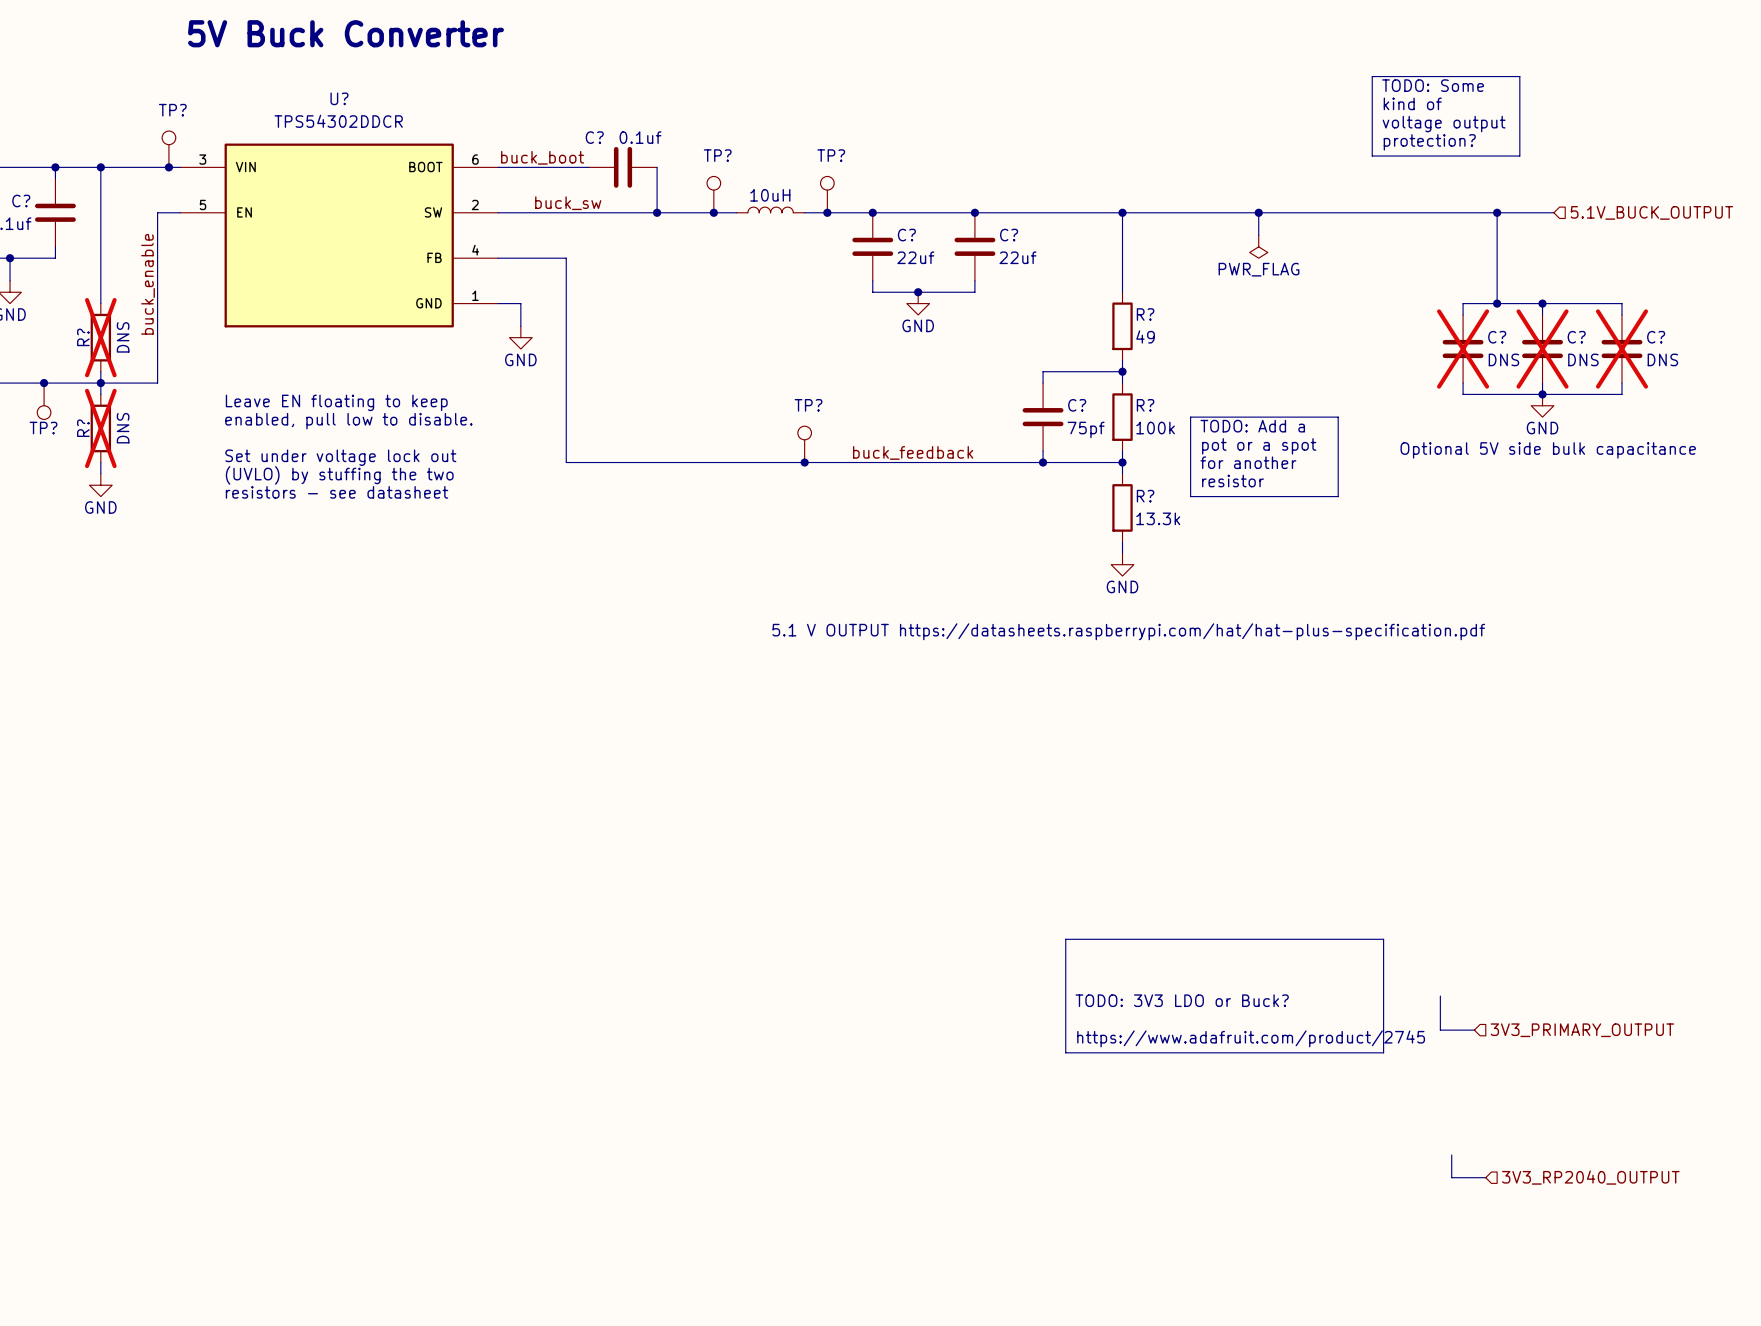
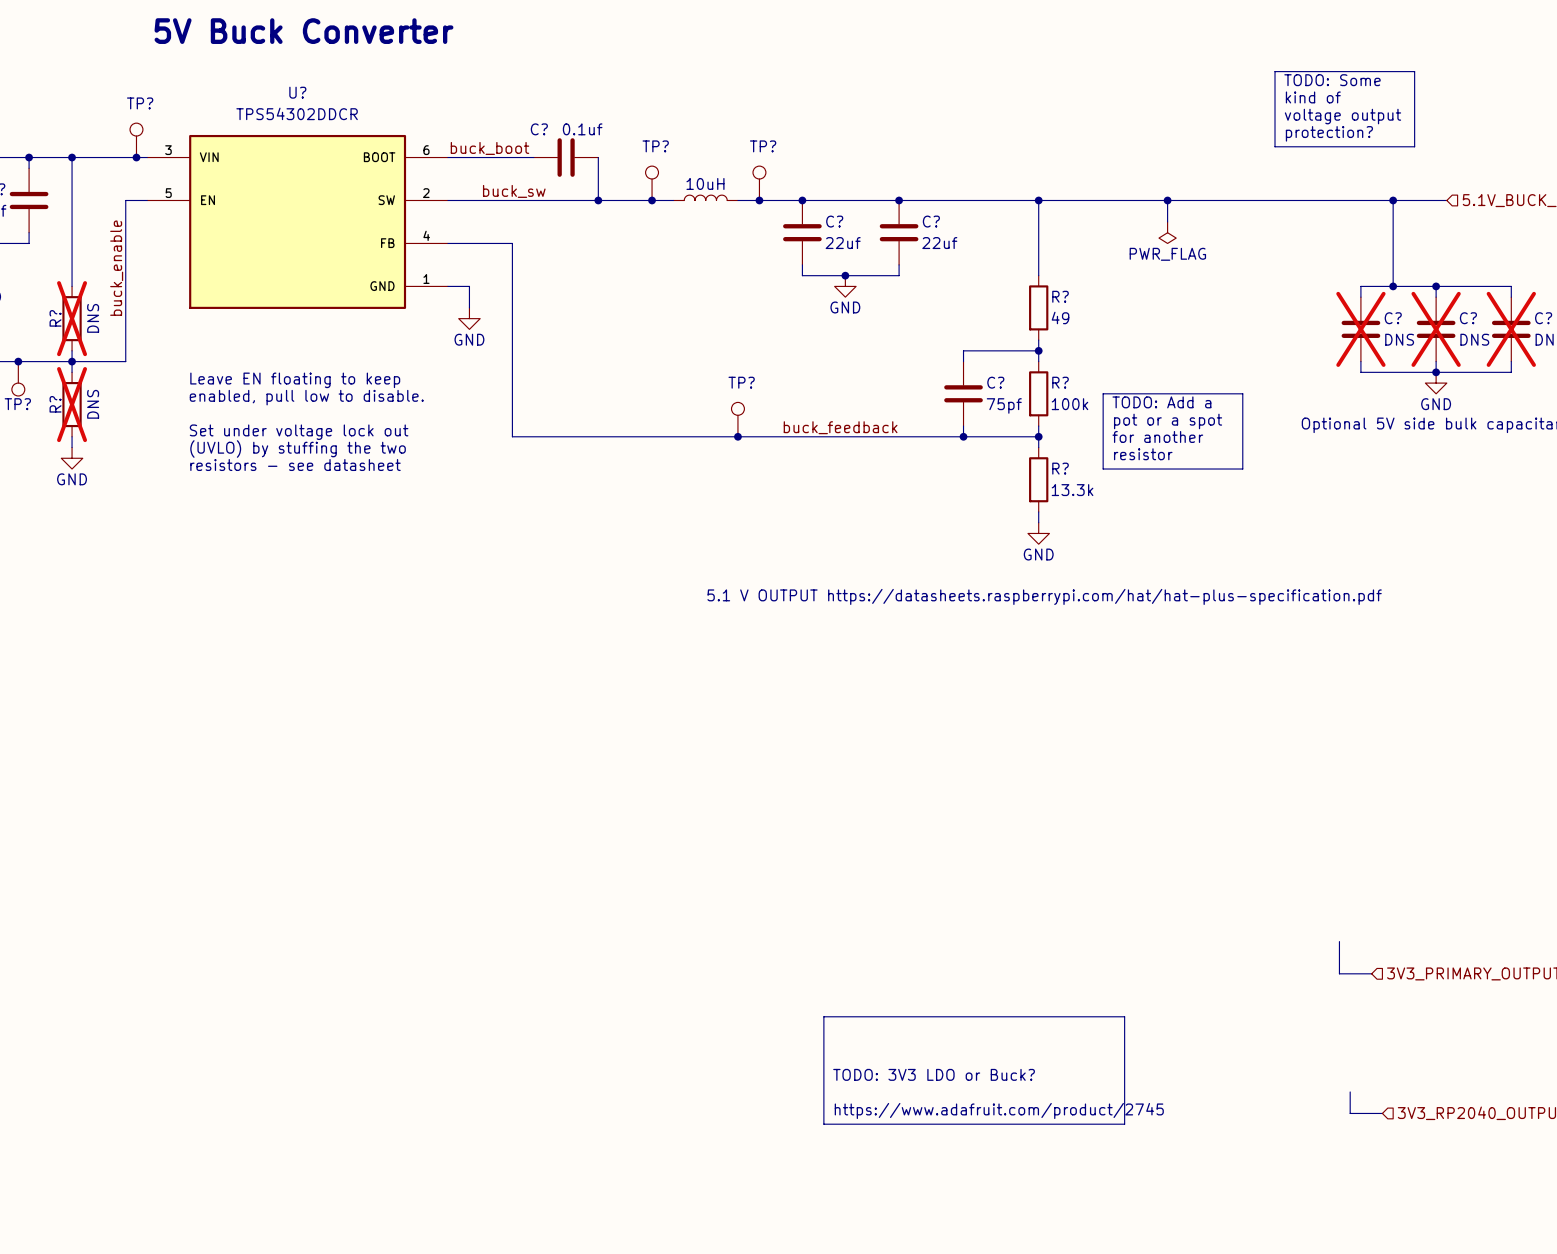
line: (1065, 939) (1383, 939) (1383, 1052) (1065, 1052) (1065, 939) -> (823, 1016) (1124, 1016) (1124, 1124) (823, 1124) (823, 1016)
text position: TODO: 3V3 LDO or Buck? (1182, 1000) -> TODO: 3V3 LDO or Buck? (934, 1074)
text position: https://www.adafruit.com/product/2745 (1251, 1038) -> https://www.adafruit.com/product/2745 (999, 1110)

